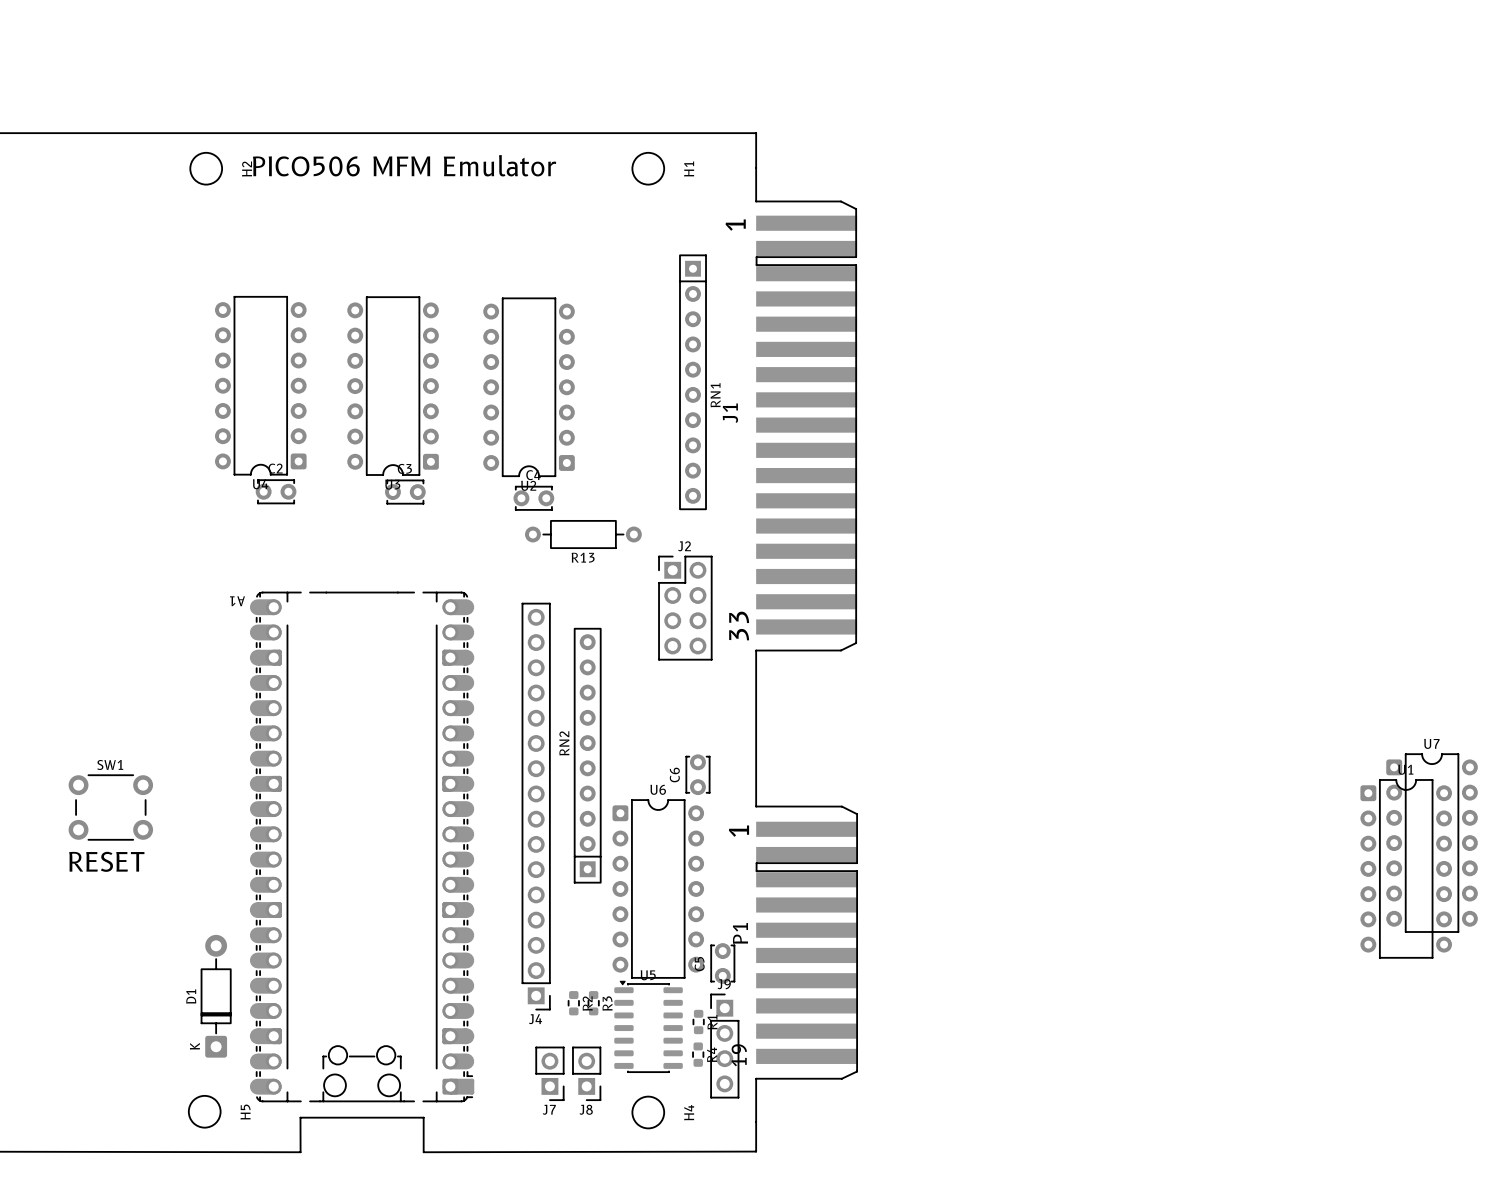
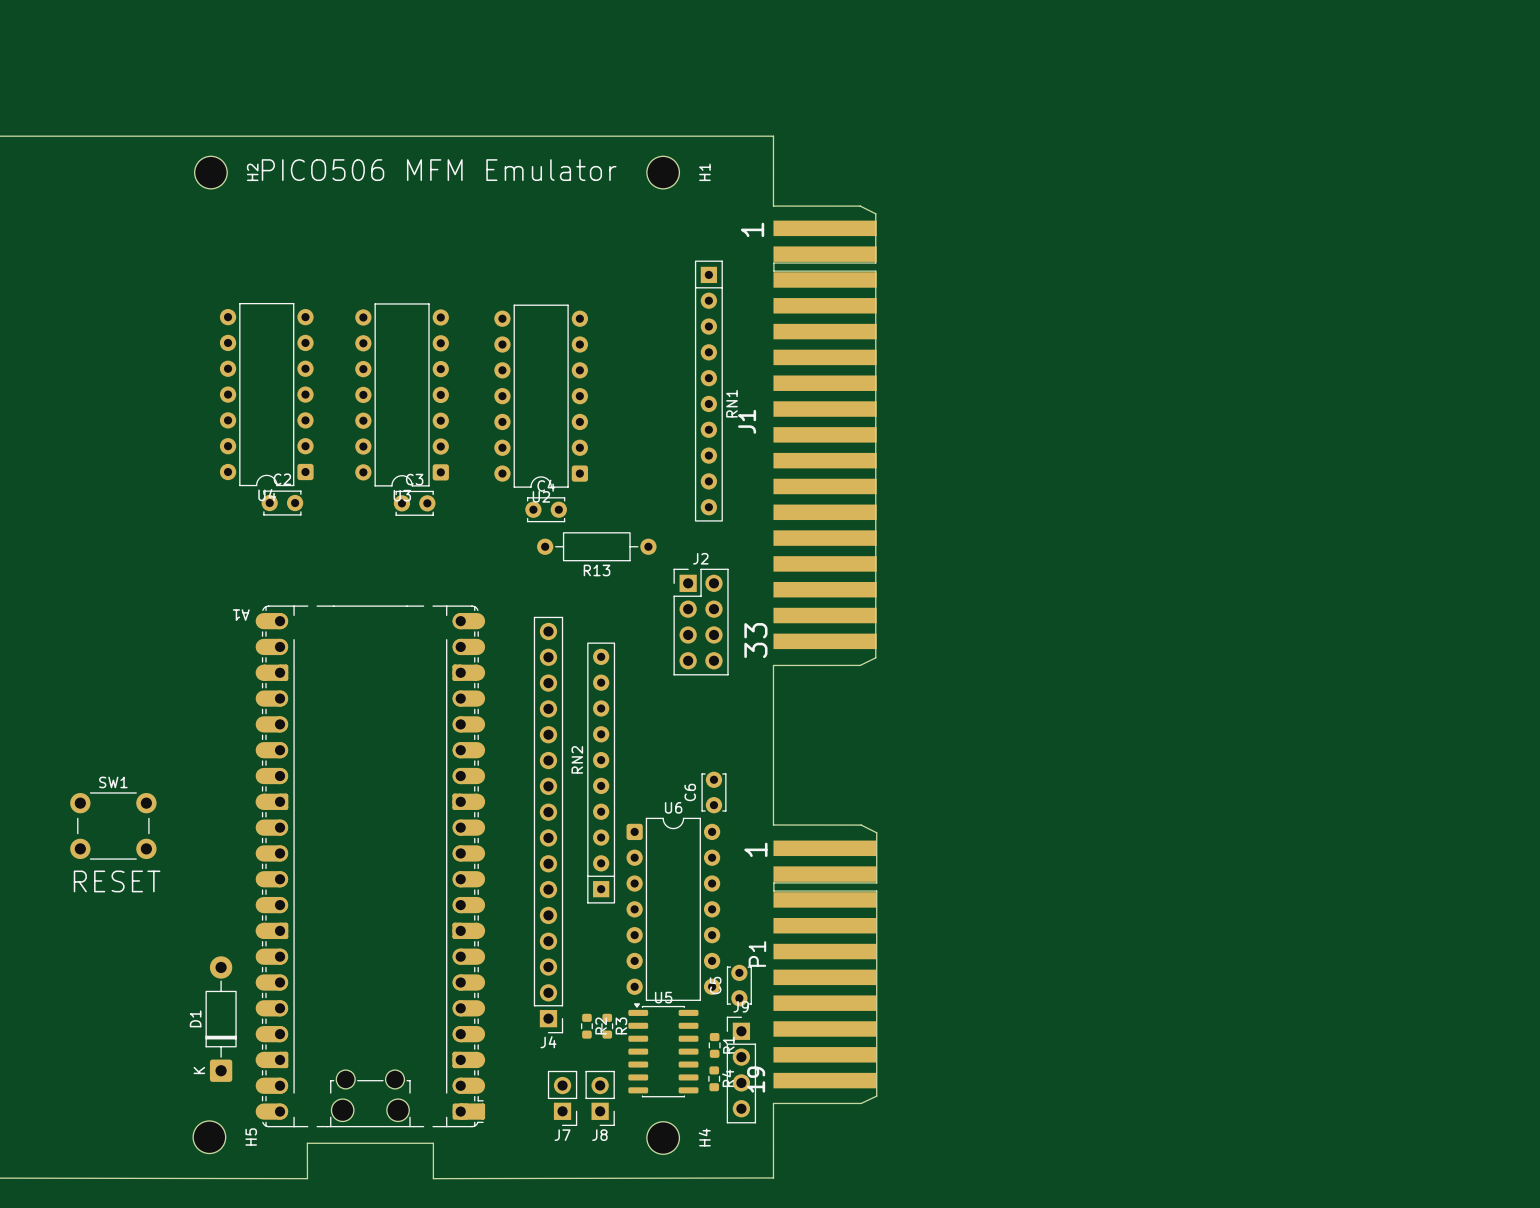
U7: (1432, 843) -> none
U1: (1406, 868) -> none

